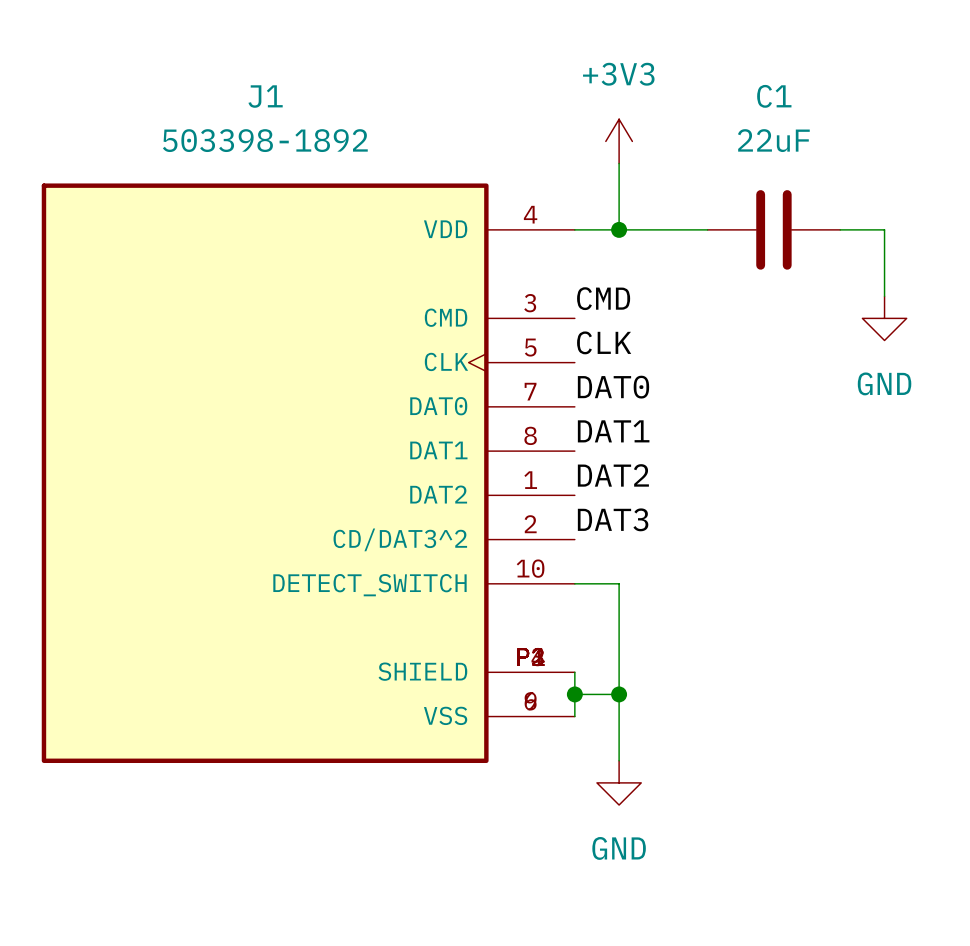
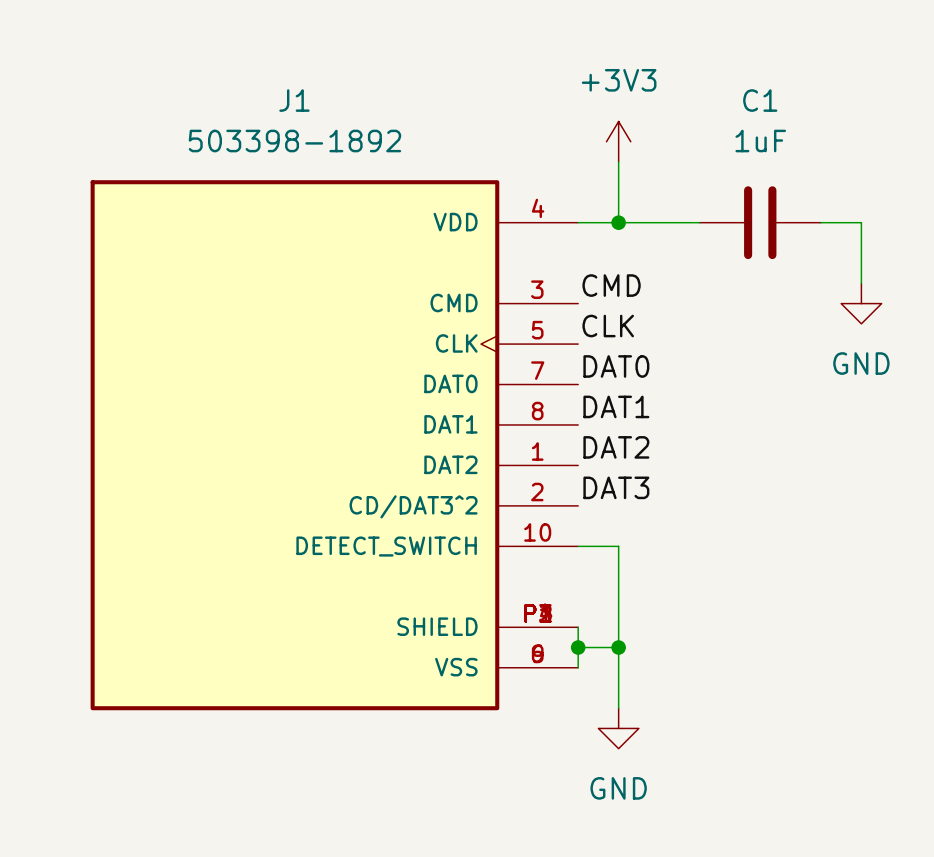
C1 value: 22uF (773, 140) -> 1uF (760, 141)

